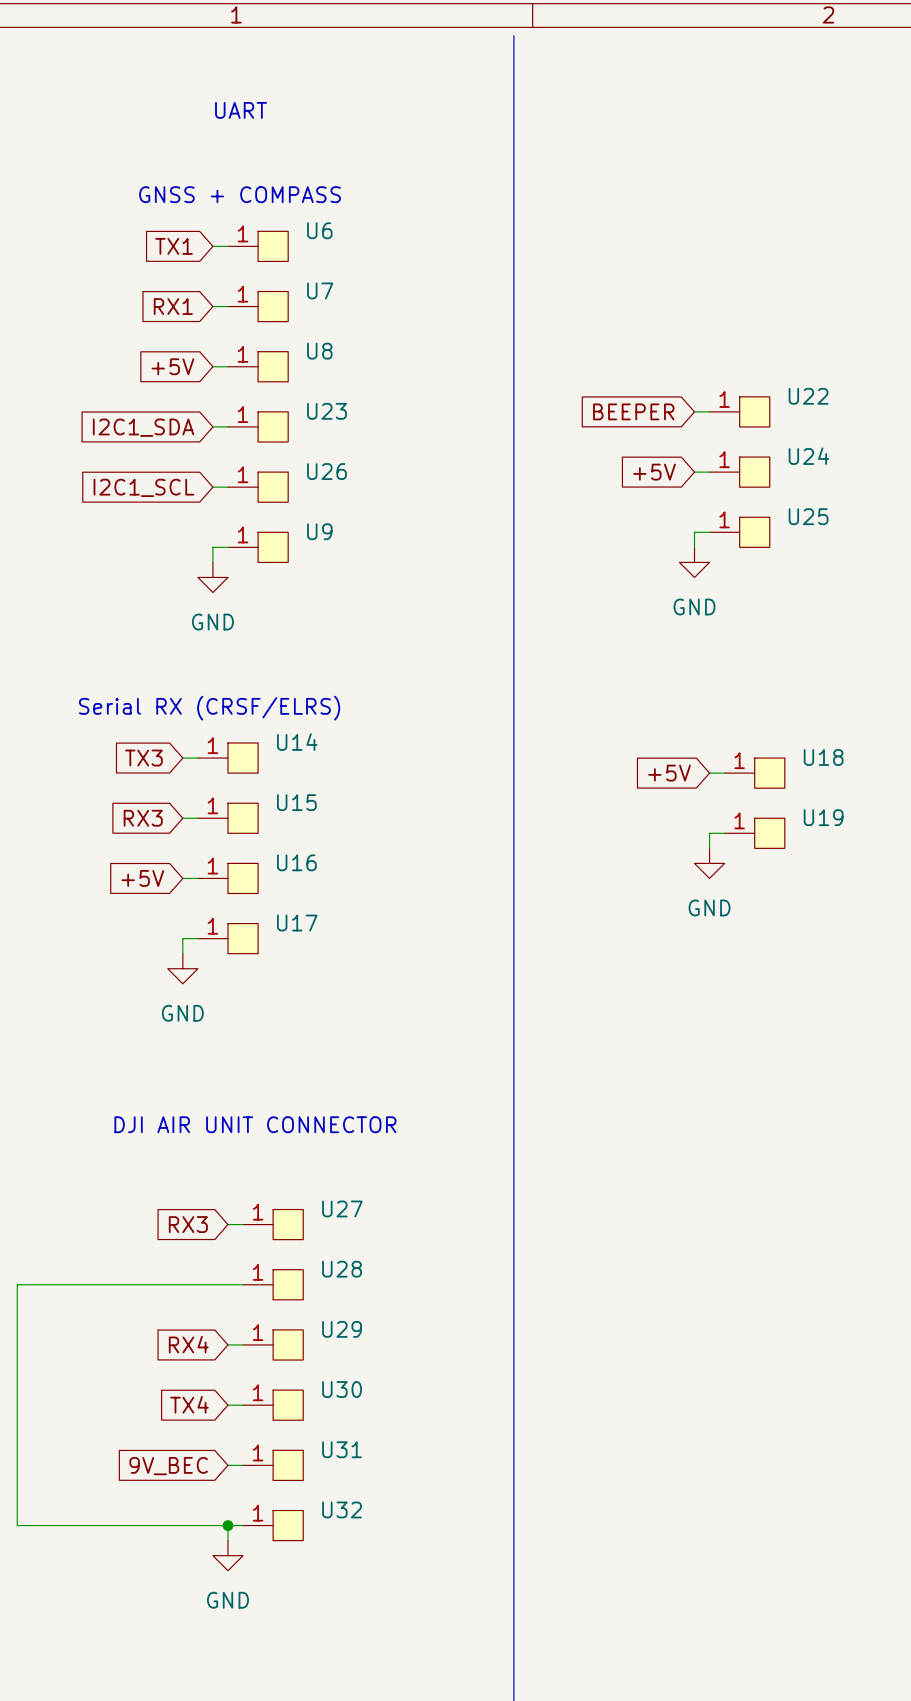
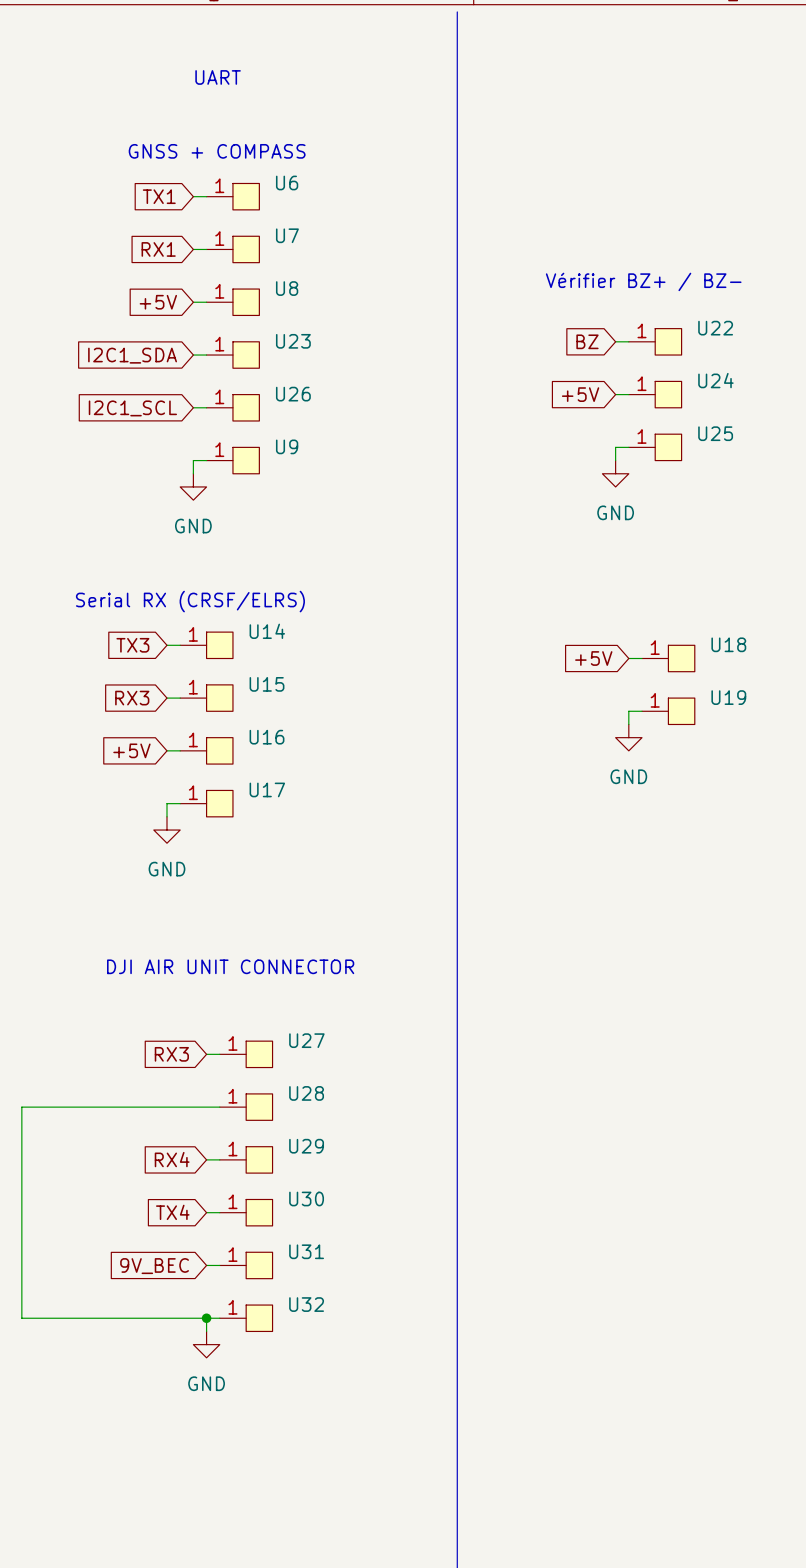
text: none -> Vérifier BZ+ / BZ- (643, 281)
global label: BEEPER (633, 411) -> BZ (587, 341)

